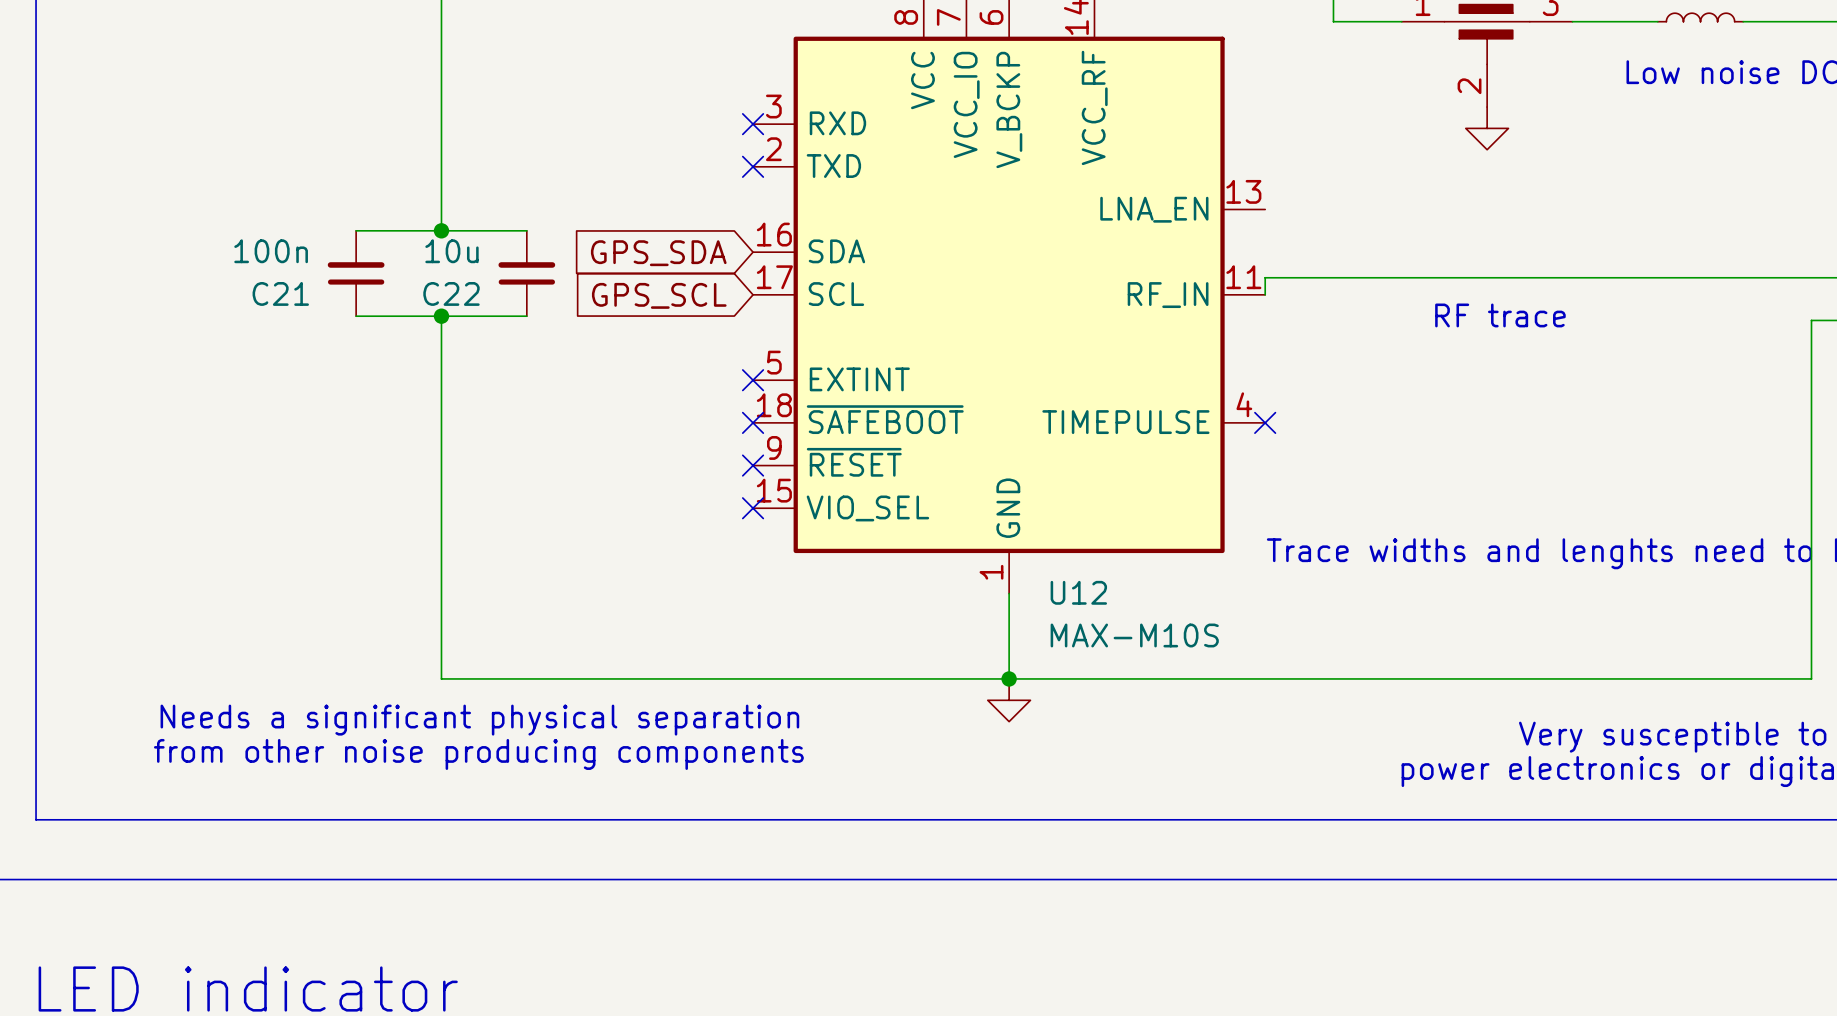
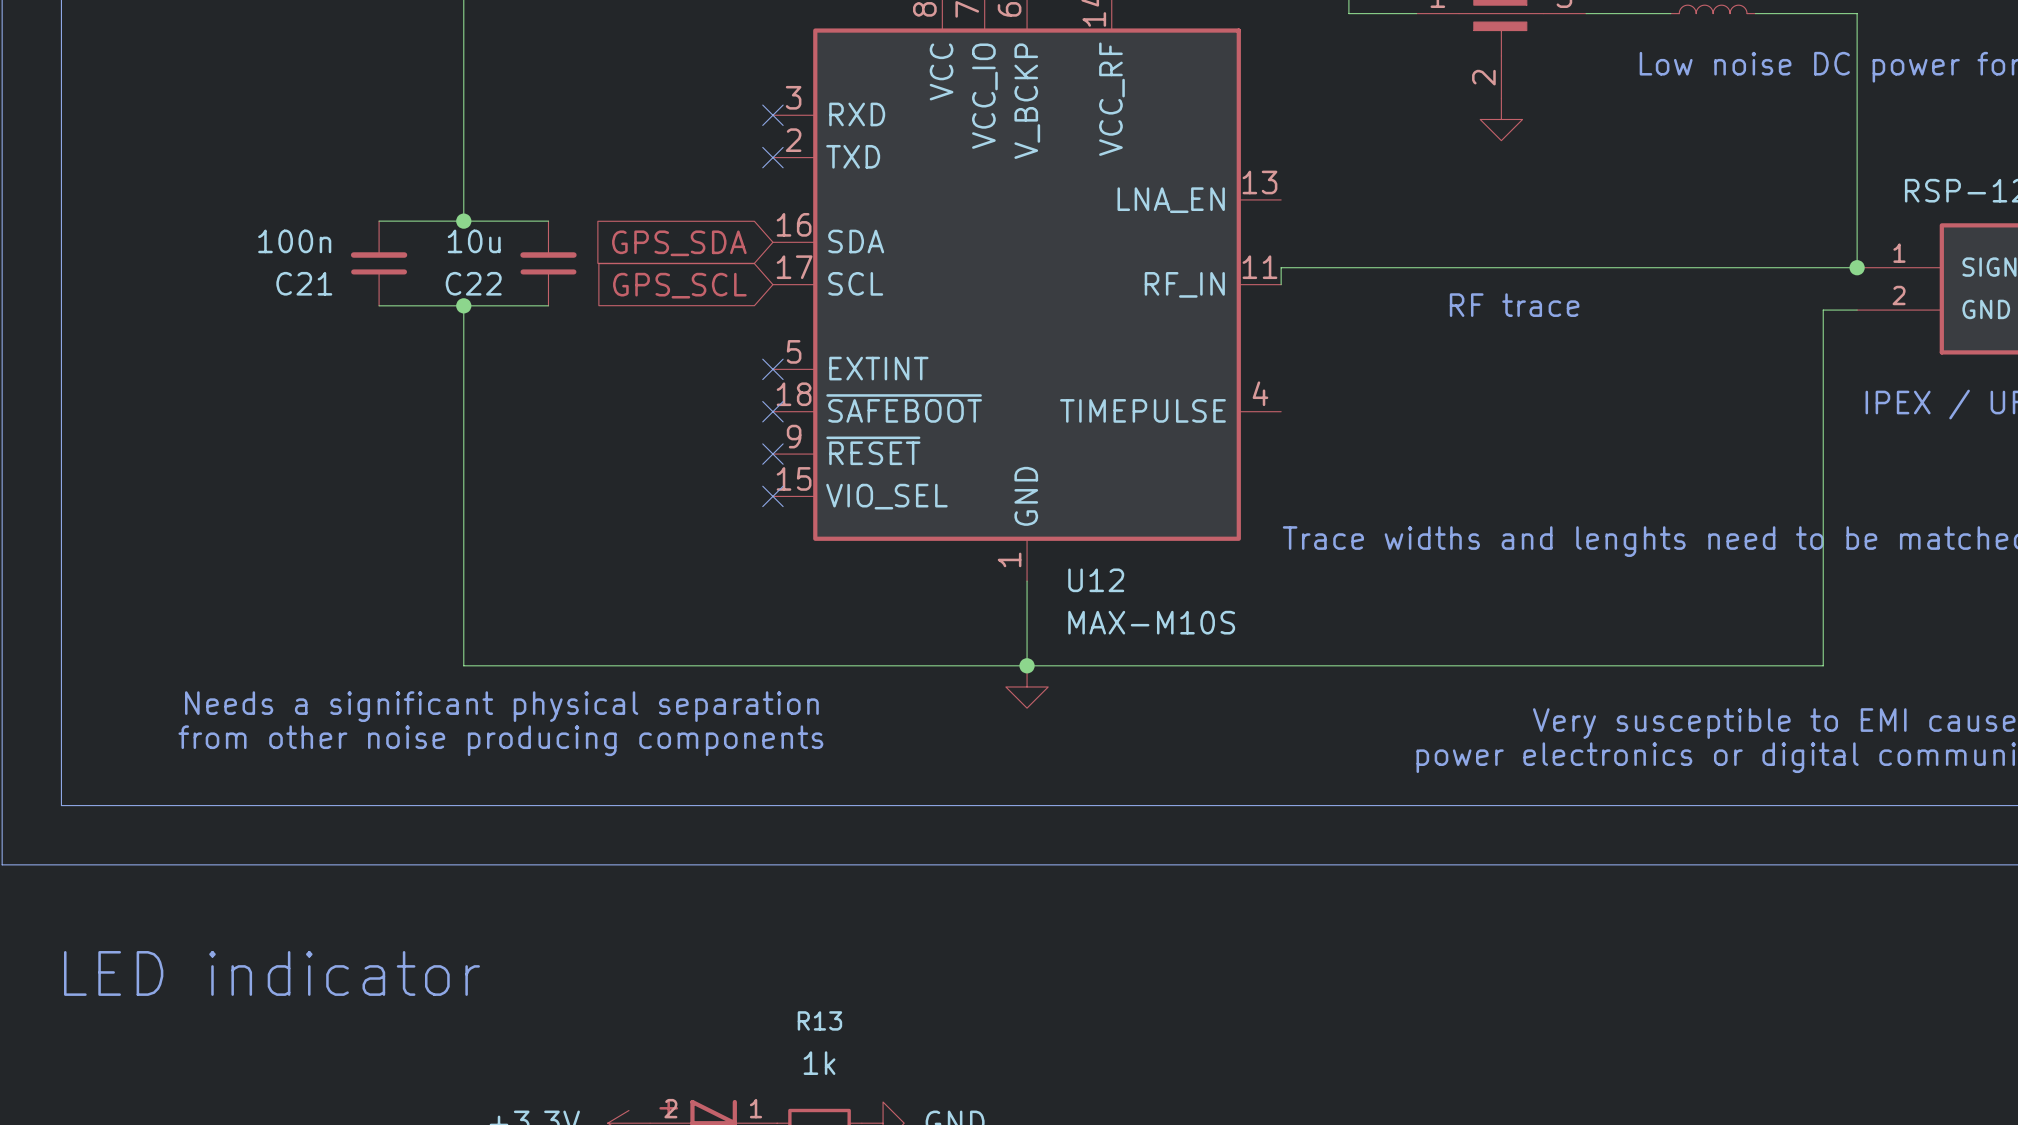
no-connect mark: (1265, 422) -> none

